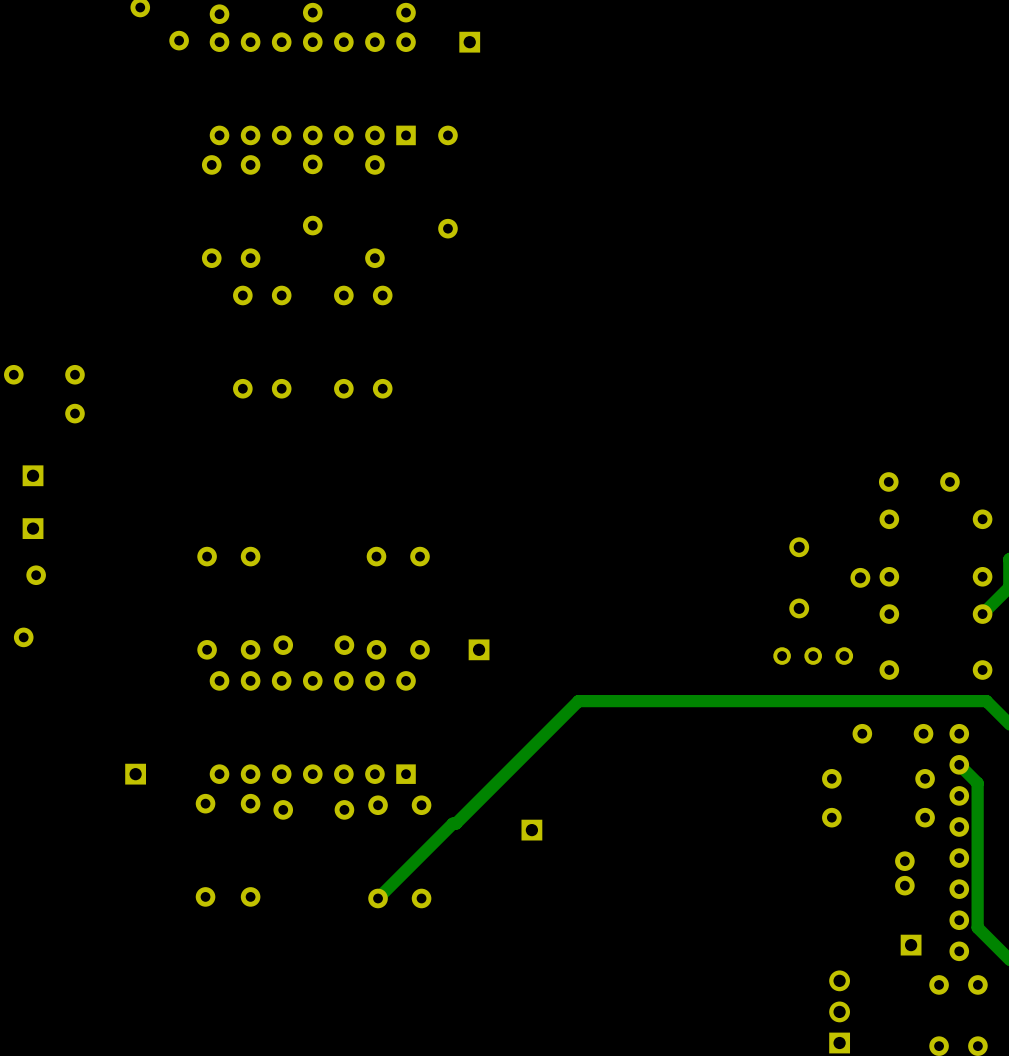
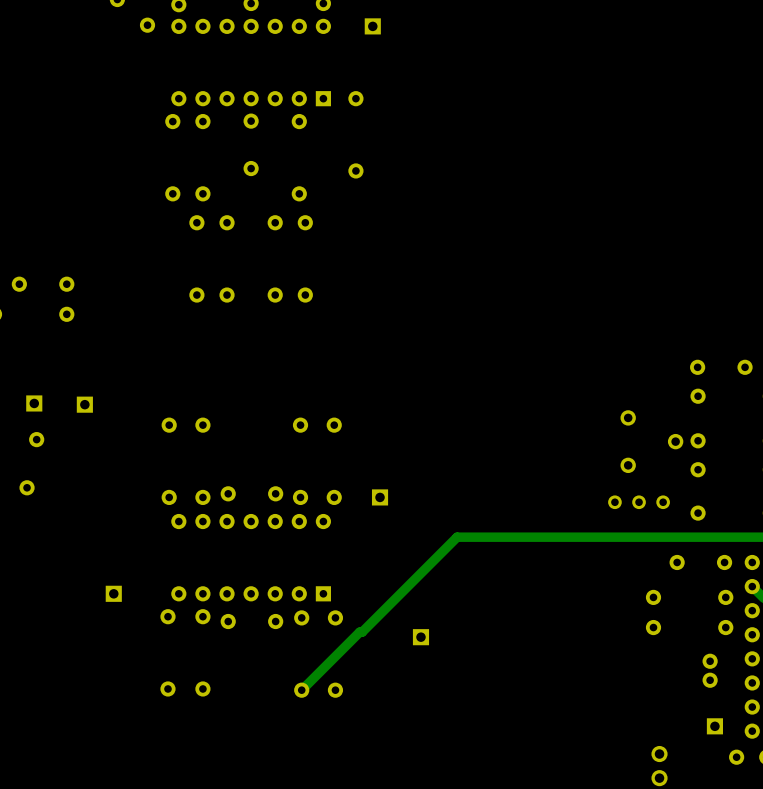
part position: (33, 475) -> (84, 404)

